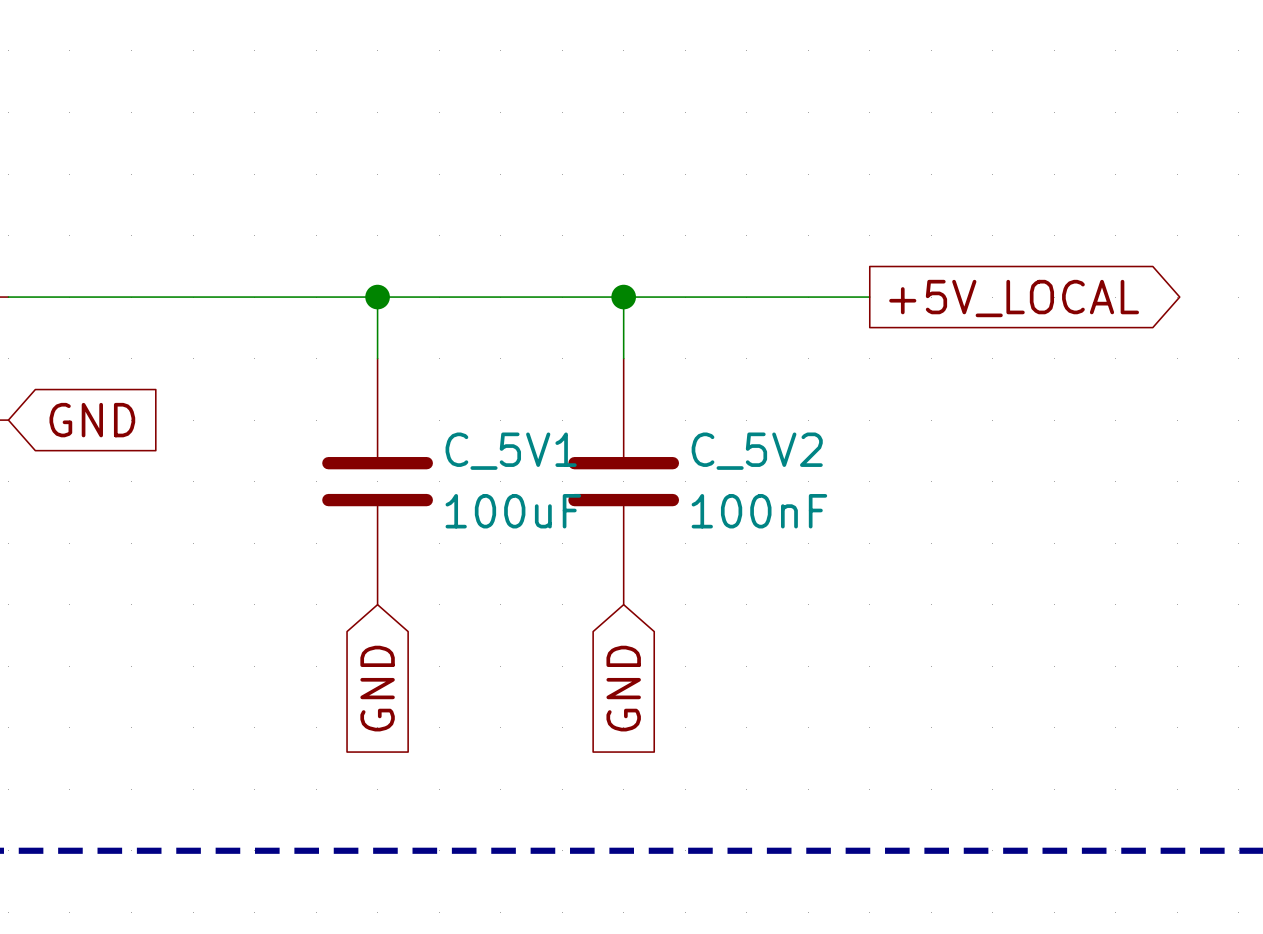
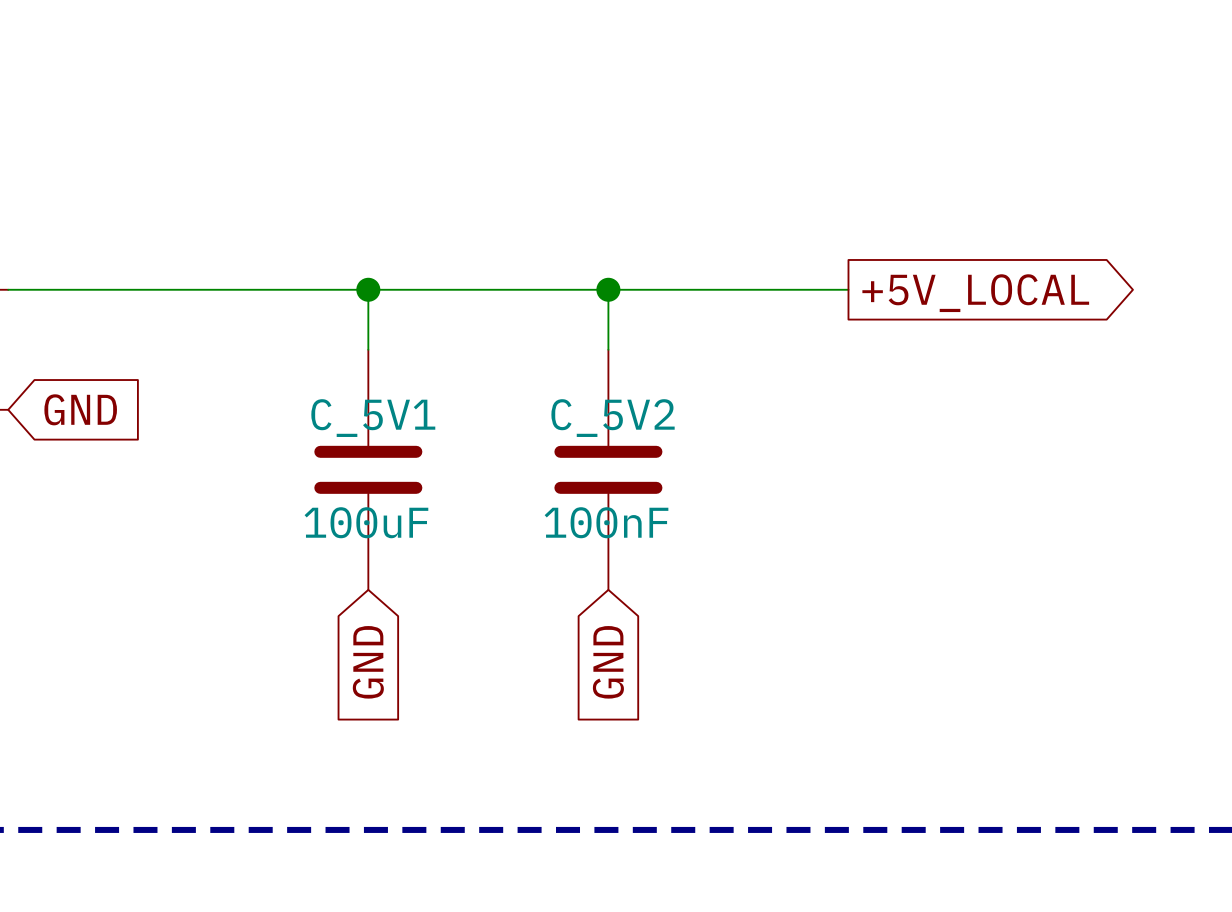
C_5V1 name position: C_5V1 (511, 451) -> C_5V1 (373, 418)
C_5V2 name position: C_5V2 (757, 451) -> C_5V2 (613, 418)
C_5V1 value position: 100uF (513, 511) -> 100uF (366, 522)
C_5V2 value position: 100nF (759, 511) -> 100nF (606, 522)

